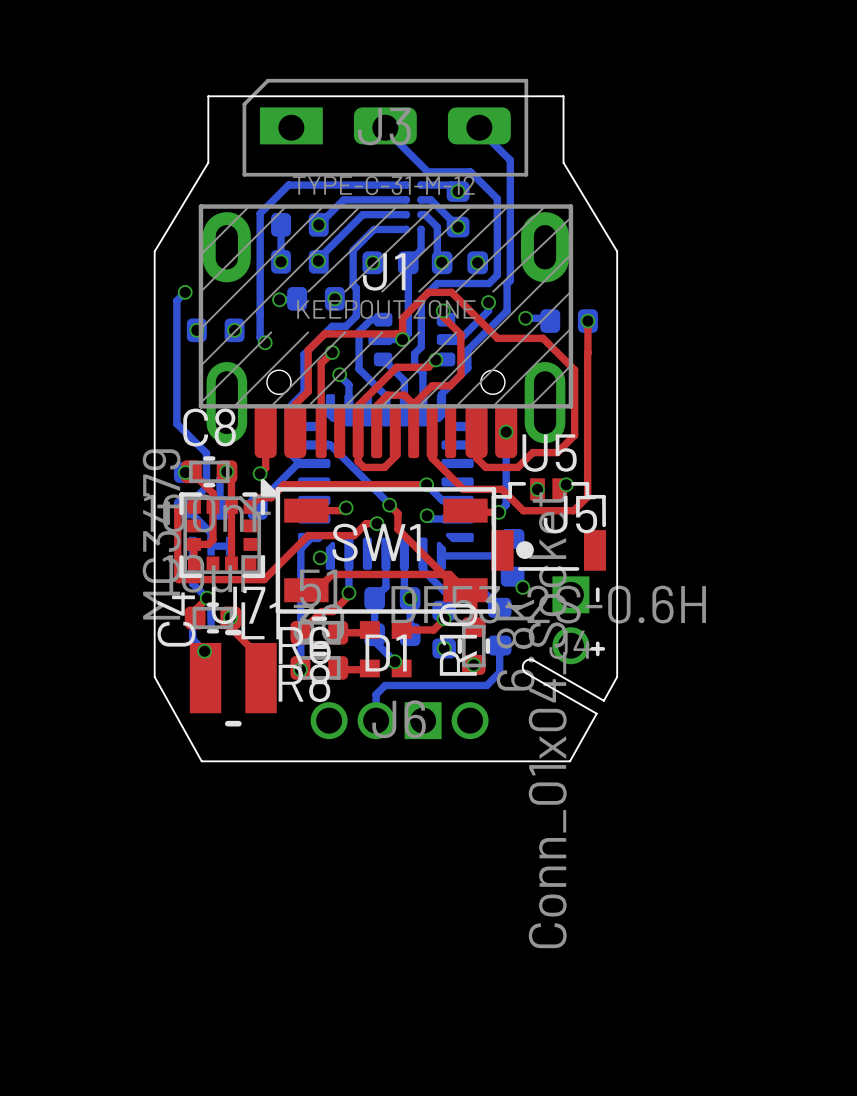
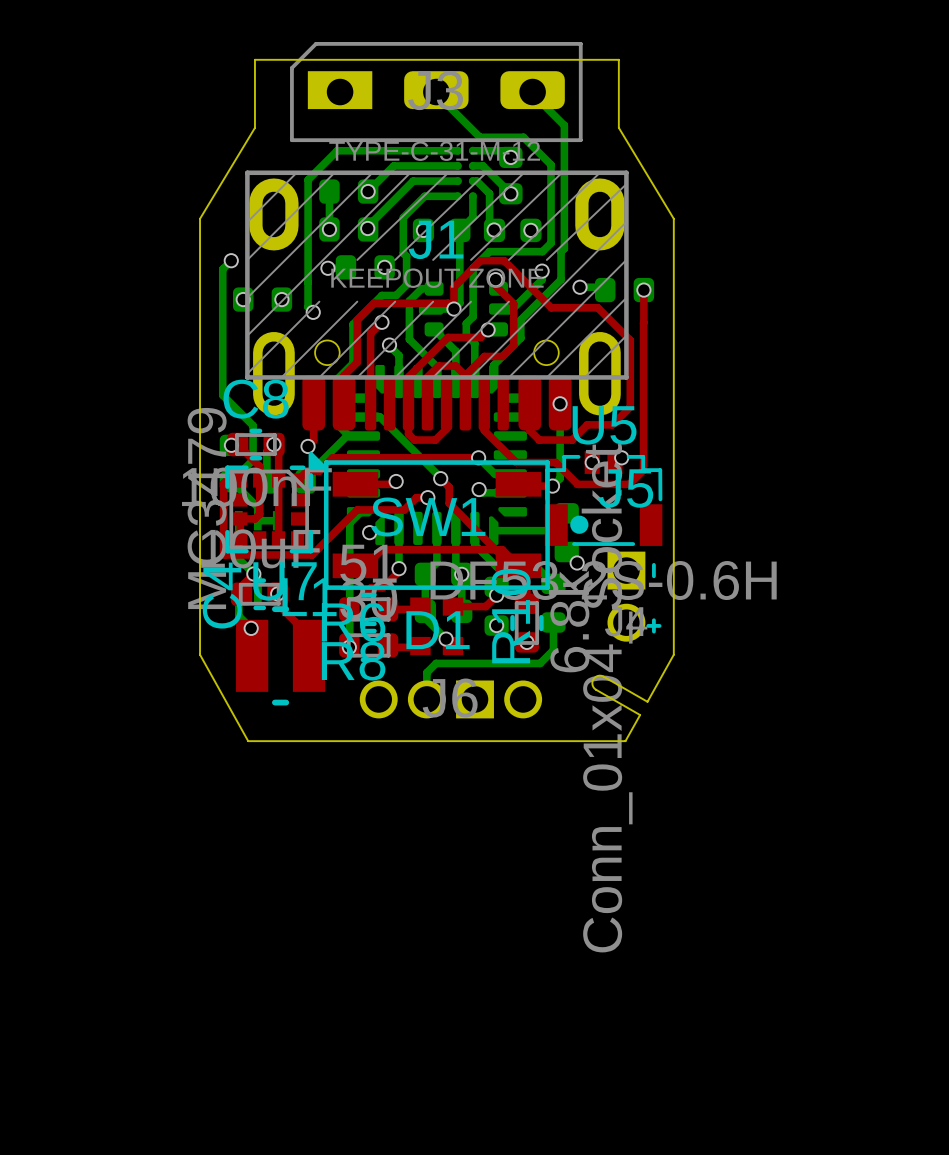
board edge: (603, 700) (533, 660) (527, 659) (523, 663) (522, 668) (525, 672) (596, 713) (584, 735) -> (660, 679) (647, 701) (602, 676) (597, 676) (593, 679) (592, 684) (595, 689) (640, 715)

